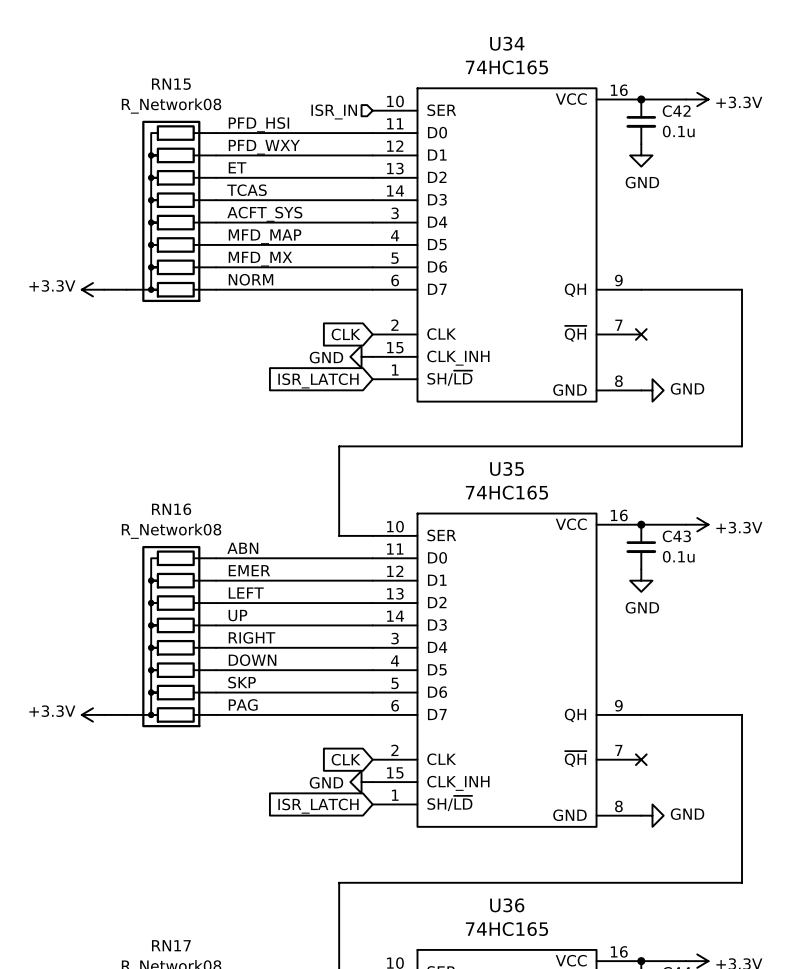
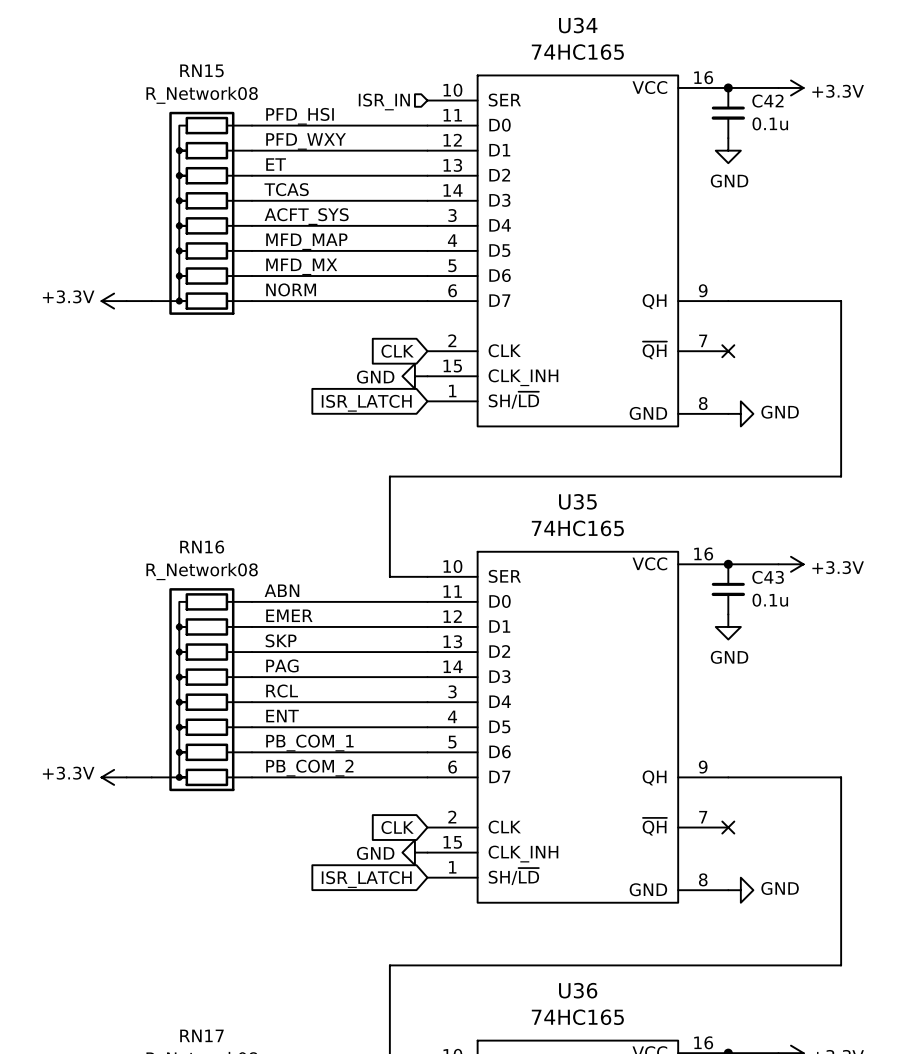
label: LEFT (246, 593) -> SKP (281, 640)
label: UP (237, 615) -> PAG (282, 665)
label: RIGHT (252, 637) -> RCL (282, 691)
label: DOWN (252, 660) -> ENT (282, 716)
label: SKP (242, 682) -> PB_COM_1 (309, 743)
label: PAG (243, 704) -> PB_COM_2 (309, 768)

